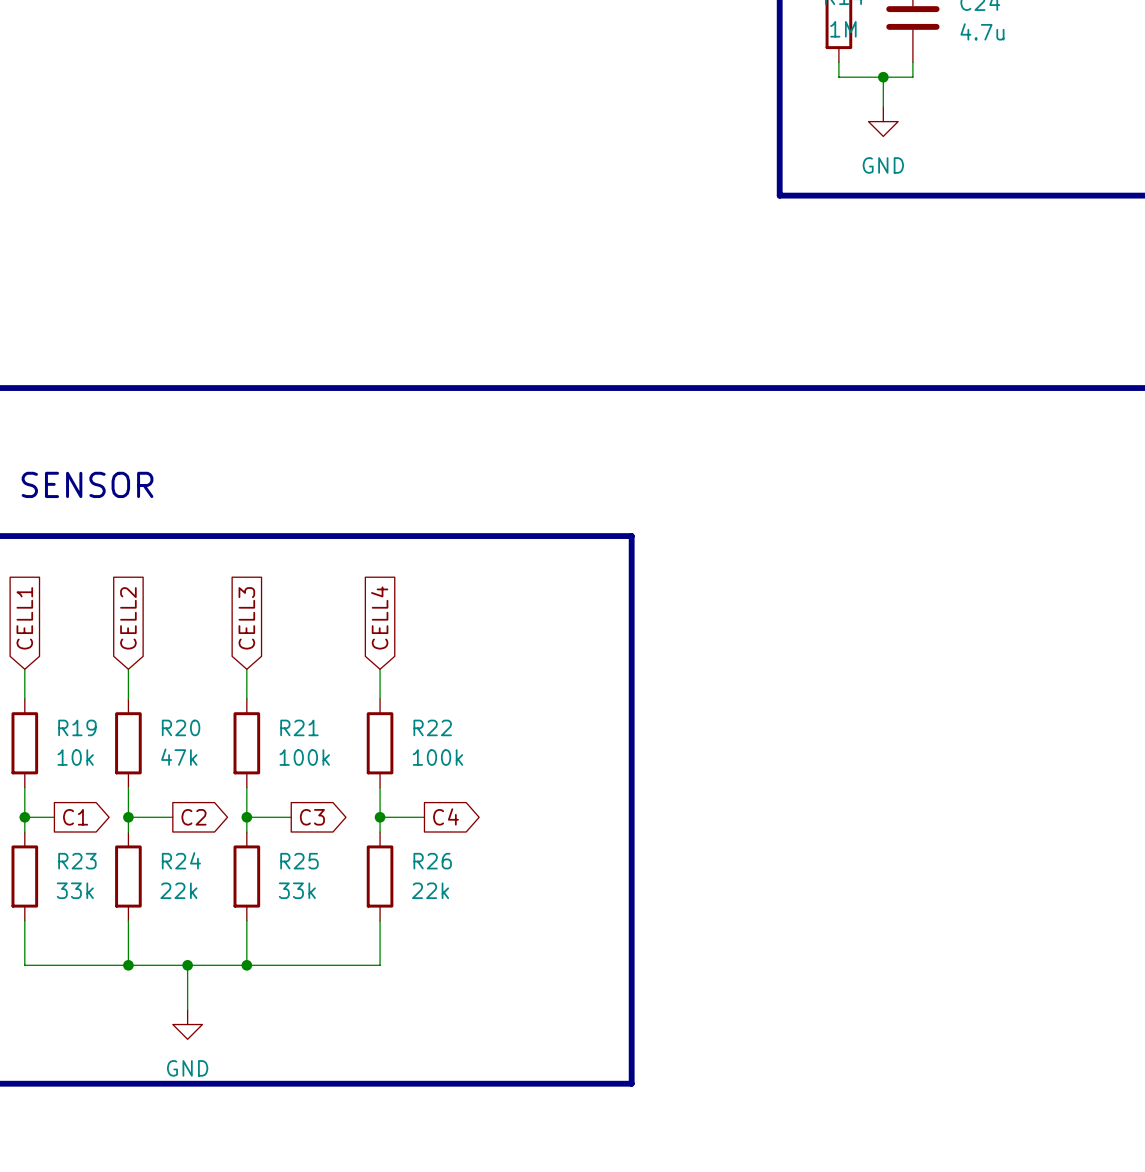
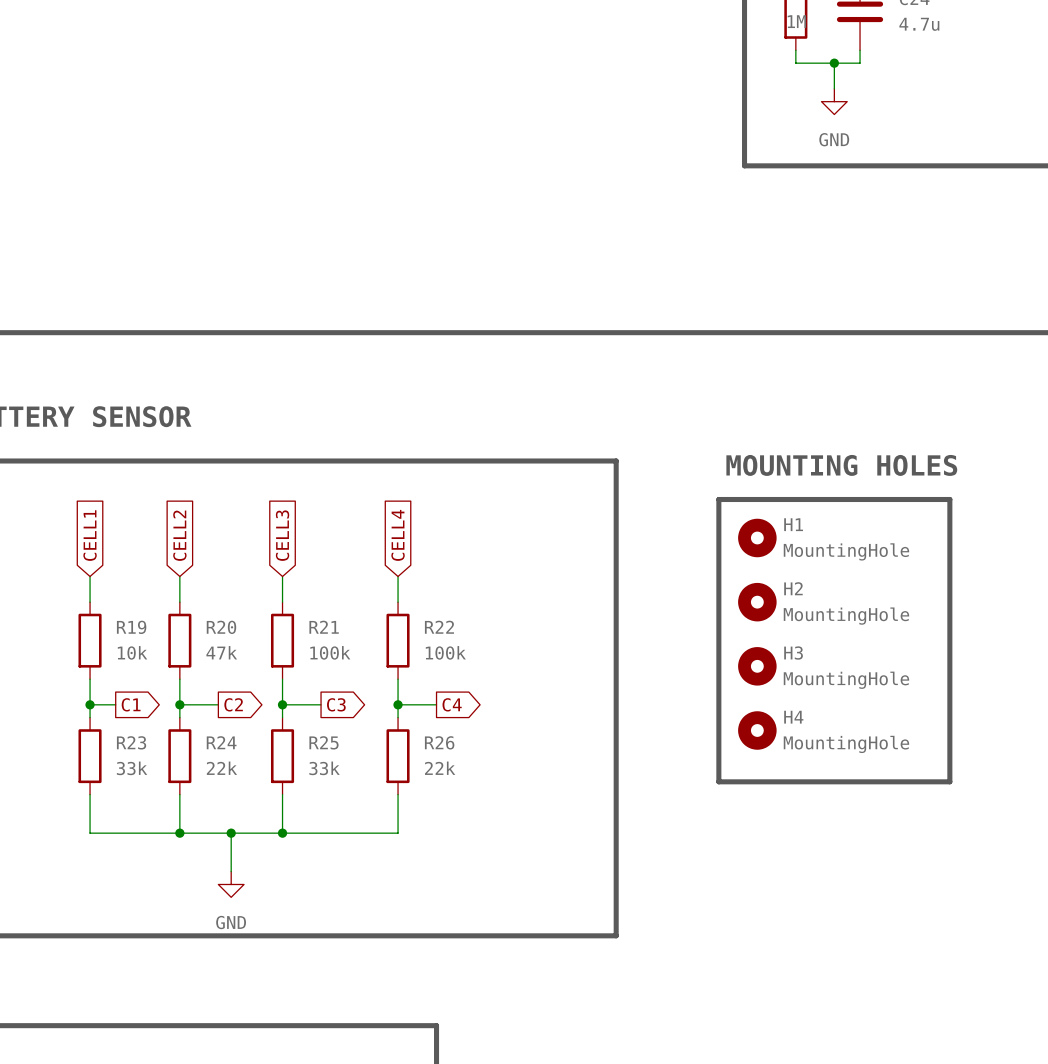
text: none -> MOUNTING HOLES (841, 465)
line: none -> (718, 499) (949, 499) (949, 781) (718, 781) (718, 499)
H1: none -> MountingHole (757, 537)
H2: none -> MountingHole (757, 602)
H3: none -> MountingHole (757, 666)
H4: none -> MountingHole (757, 730)

